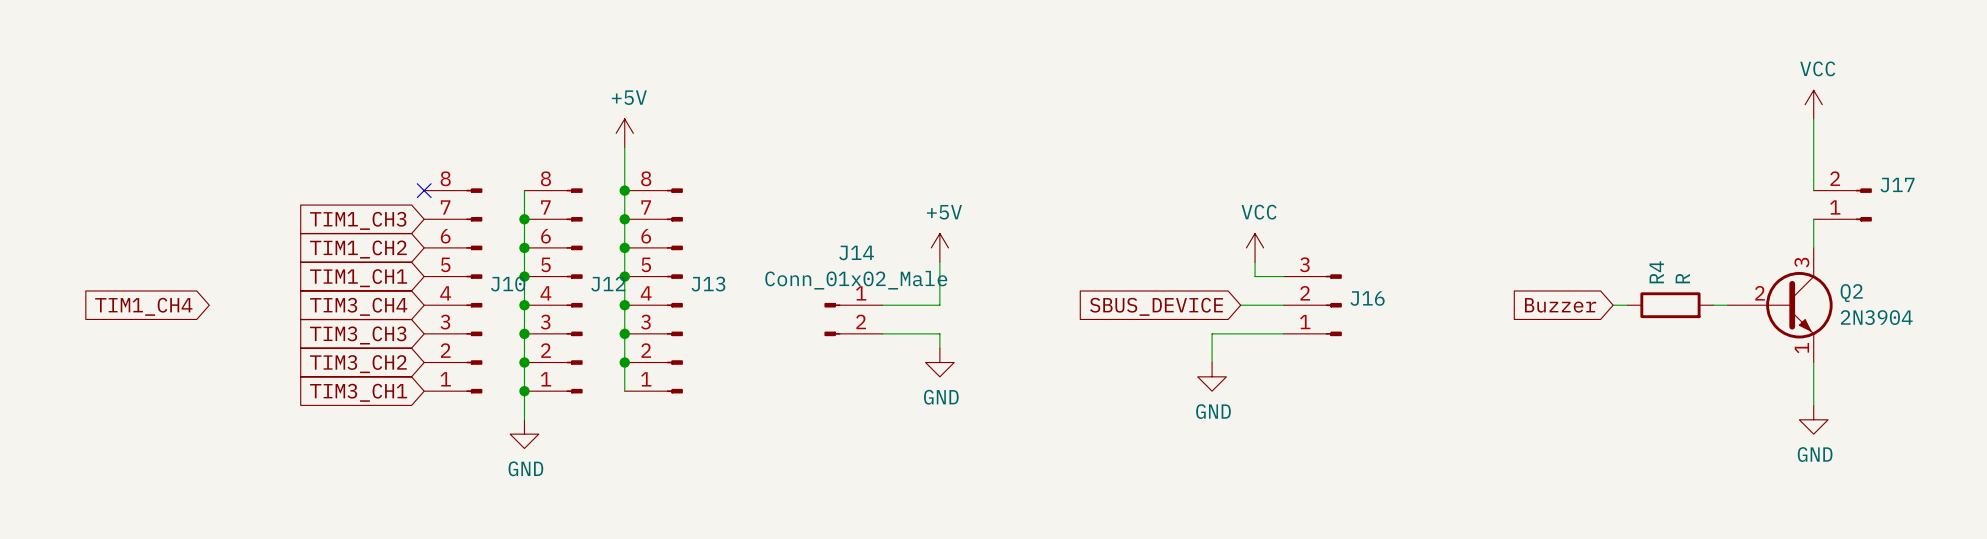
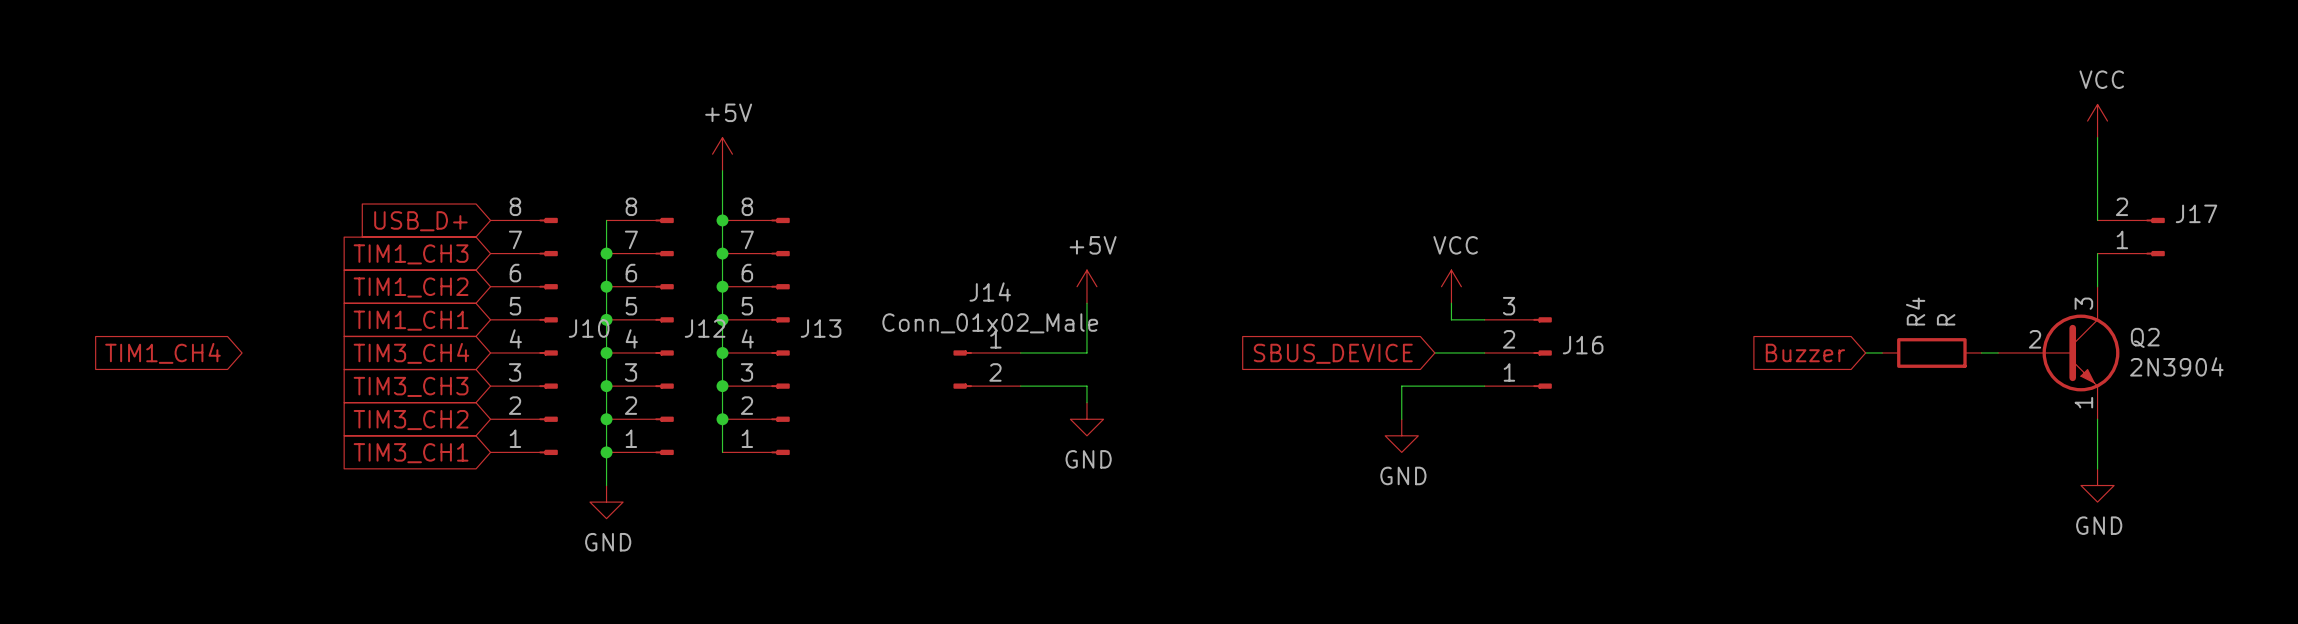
no-connect mark: (424, 190) -> none
global label: none -> USB_D+ (420, 221)

